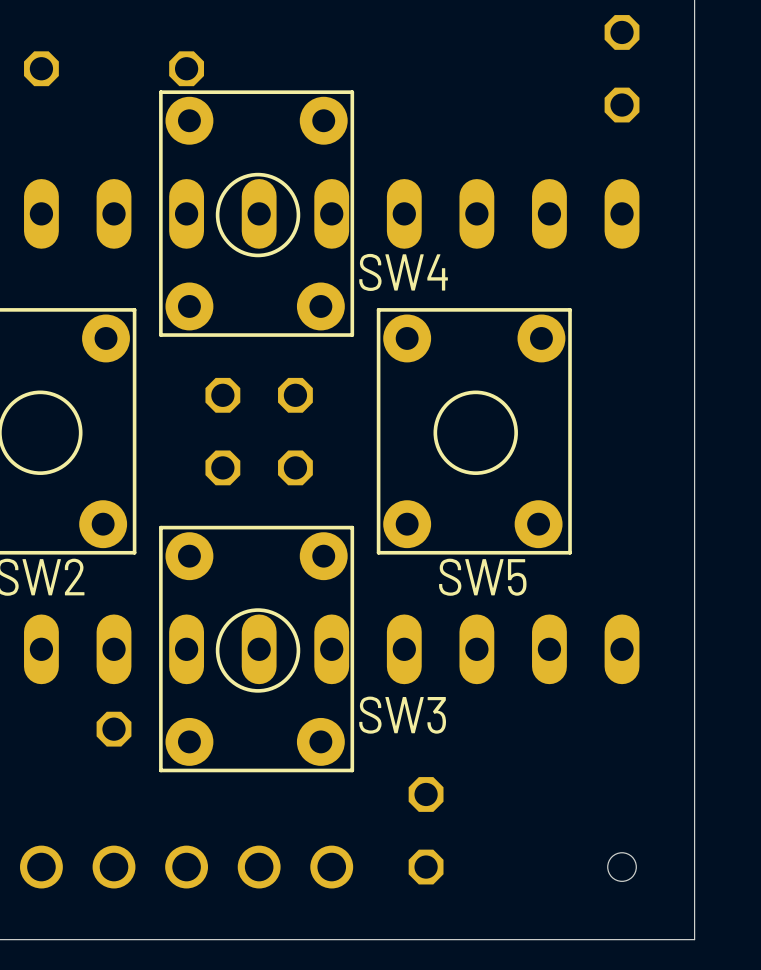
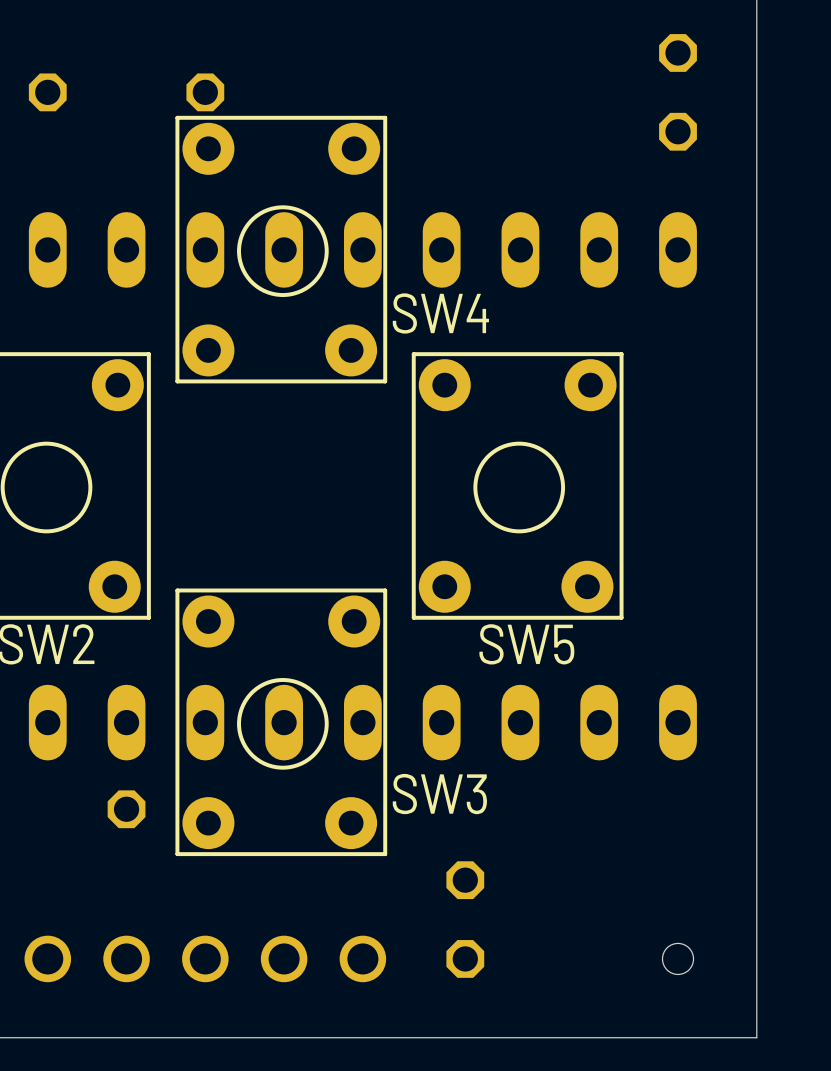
part: (259, 395) -> none
part: (259, 467) -> none

